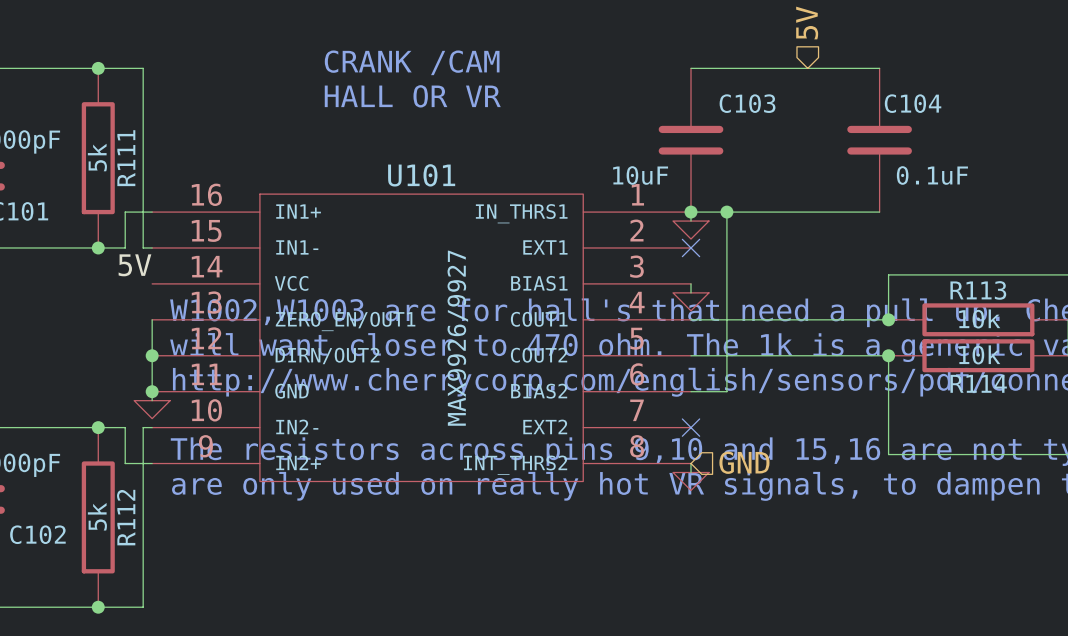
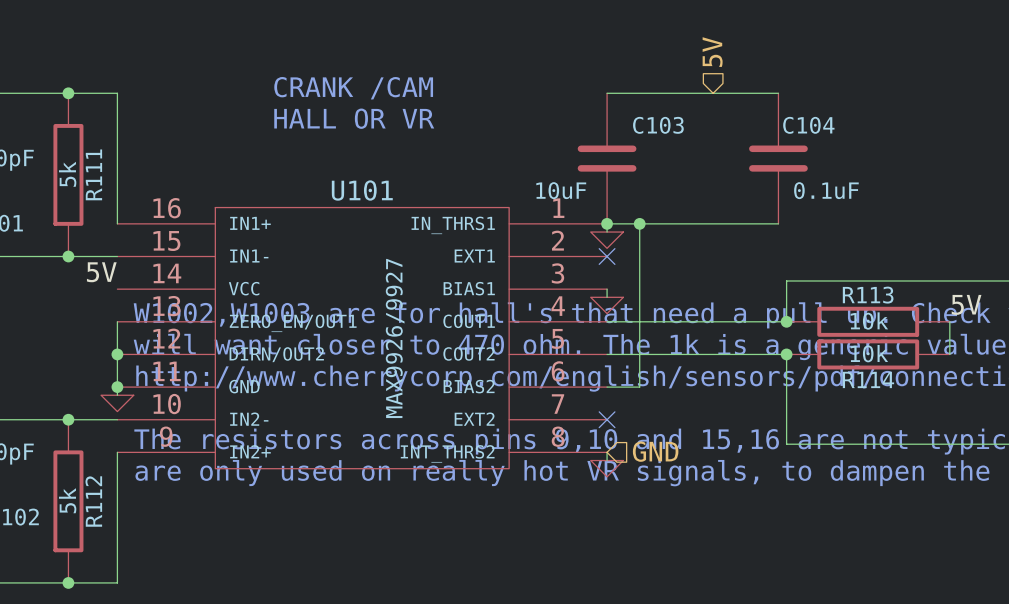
wire: (143, 68) (143, 247) -> (109, 93) (117, 93) (117, 223)
wire: (152, 212) (125, 212) (125, 247) -> (109, 256) (92, 256)
wire: (125, 427) (125, 463) (152, 463) -> (92, 419) (109, 419)
wire: (143, 427) (143, 607) -> (117, 452) (117, 582) (109, 582)

